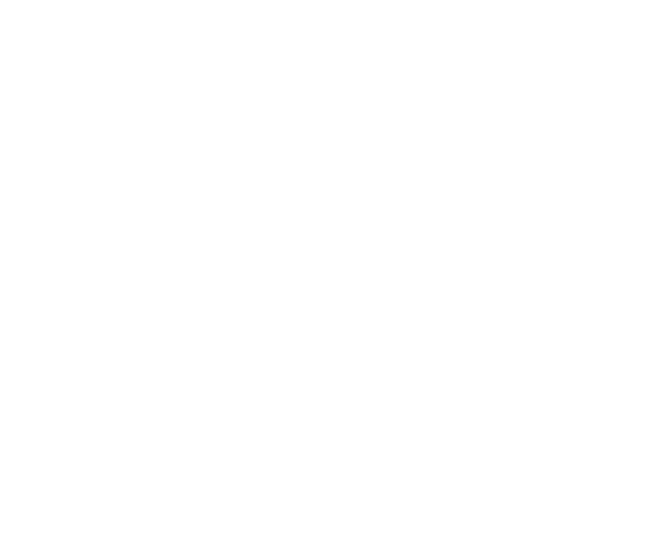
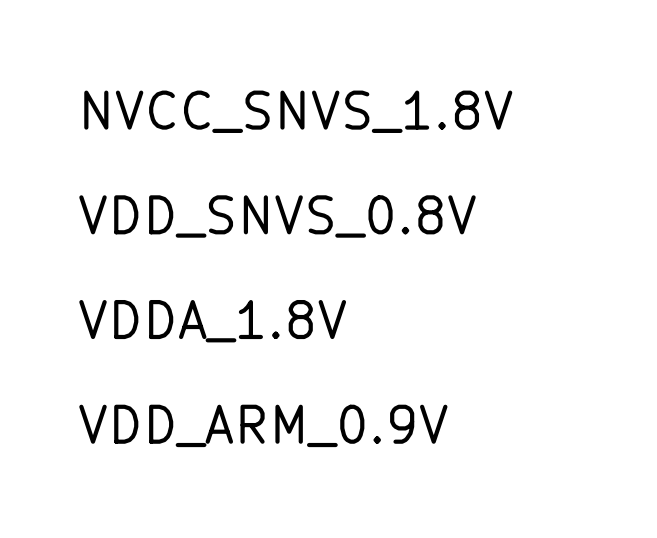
label: none -> NVCC_SNVS_1.8V (298, 111)
label: none -> VDD_SNVS_0.8V (277, 216)
label: none -> VDDA_1.8V (212, 321)
label: none -> VDD_ARM_0.9V (263, 425)

